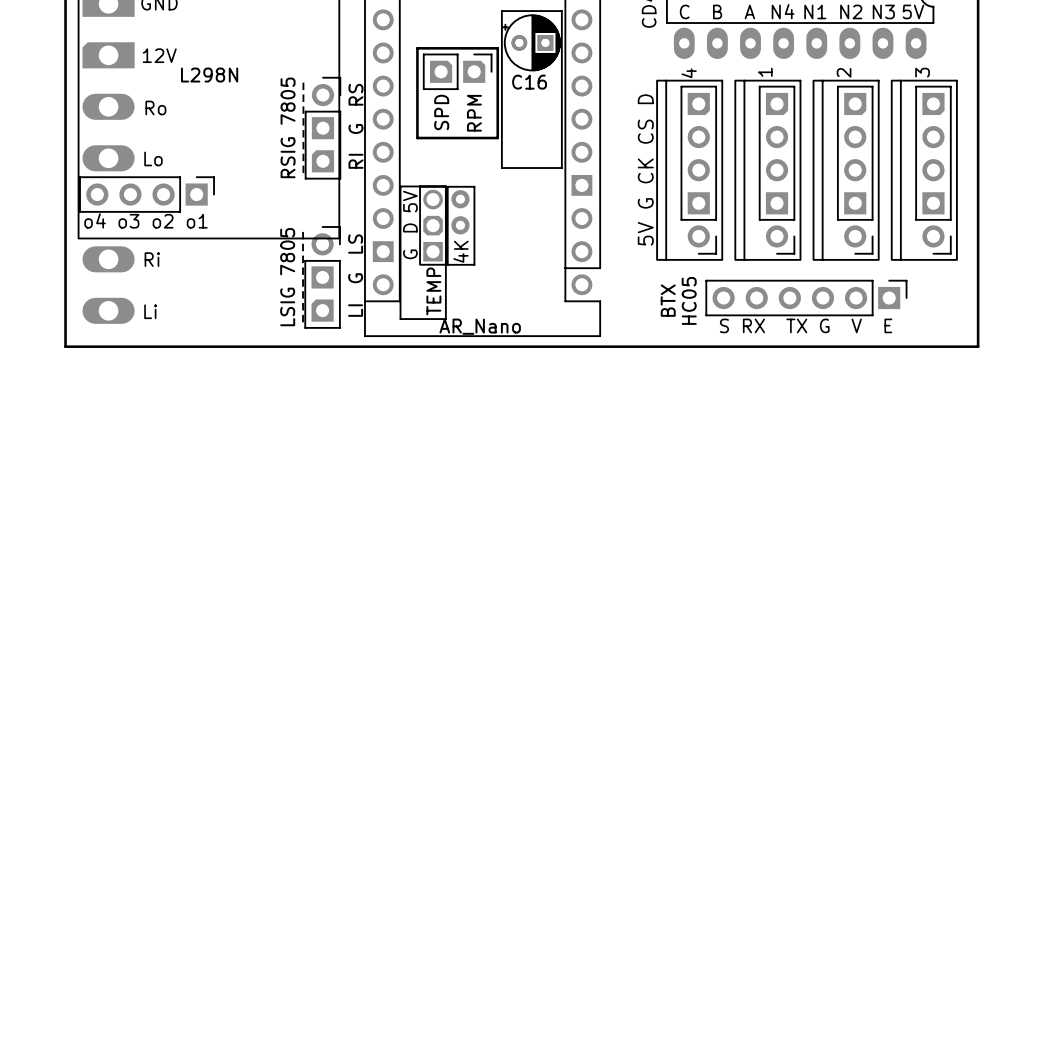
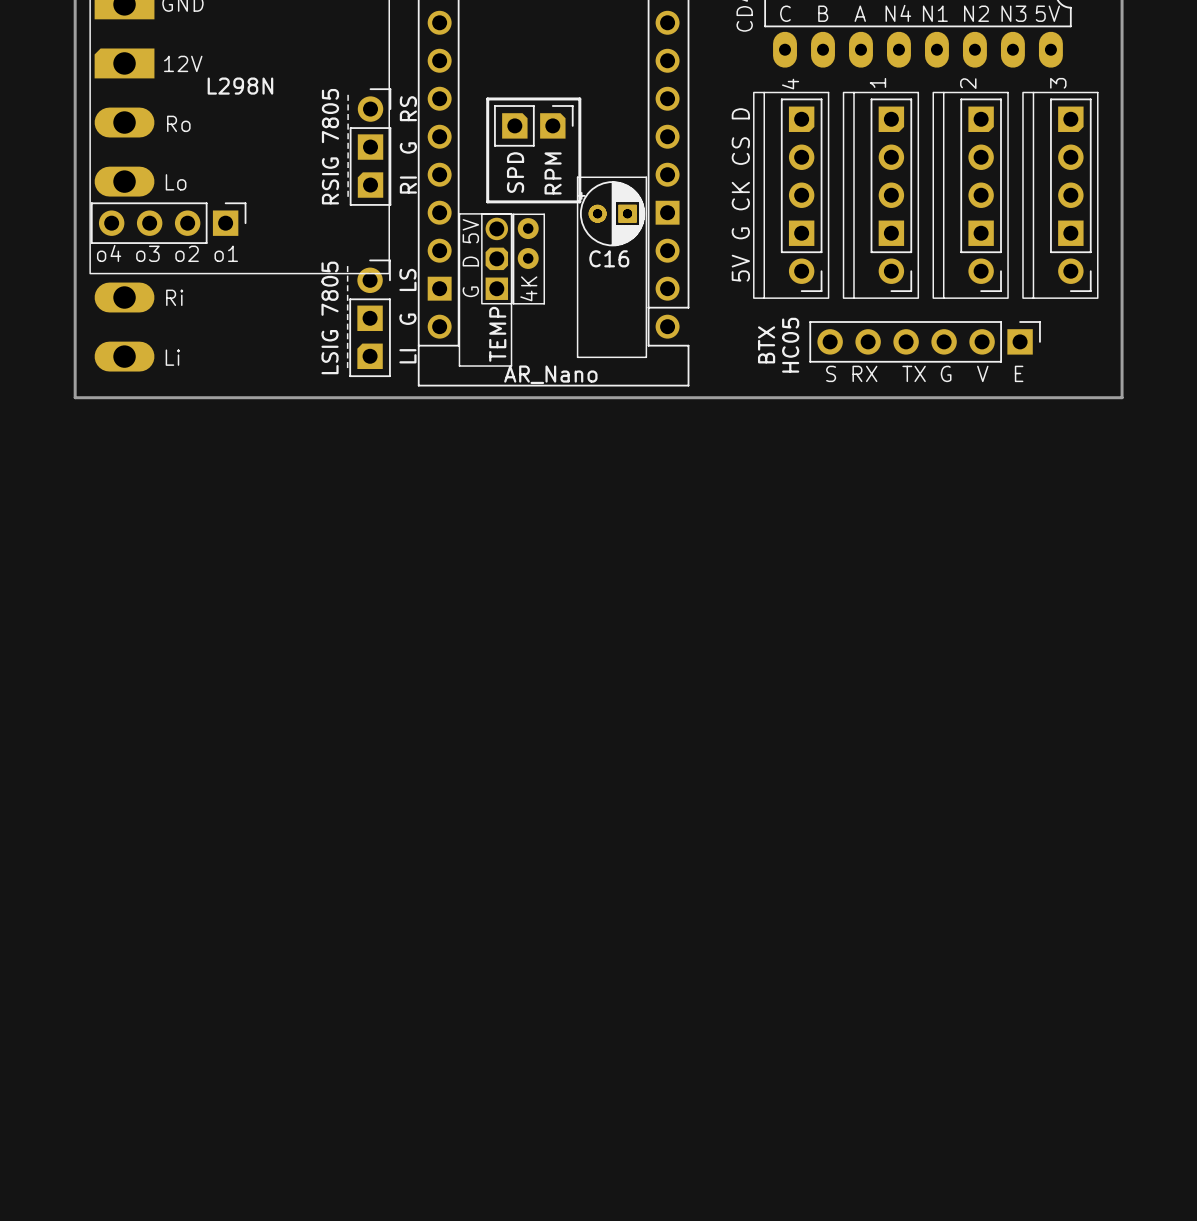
line: (501, 11) (561, 11) (561, 168) (501, 168) (501, 11) -> (577, 177) (646, 177) (646, 357) (577, 357) (577, 177)
part position: (531, 42) -> (611, 213)
part position: (532, 42) -> (612, 213)
line: (417, 48) (497, 48) (497, 138) (417, 138) (417, 48) -> (487, 98) (579, 98) (579, 201) (487, 201) (487, 98)
part position: (457, 71) -> (533, 125)

